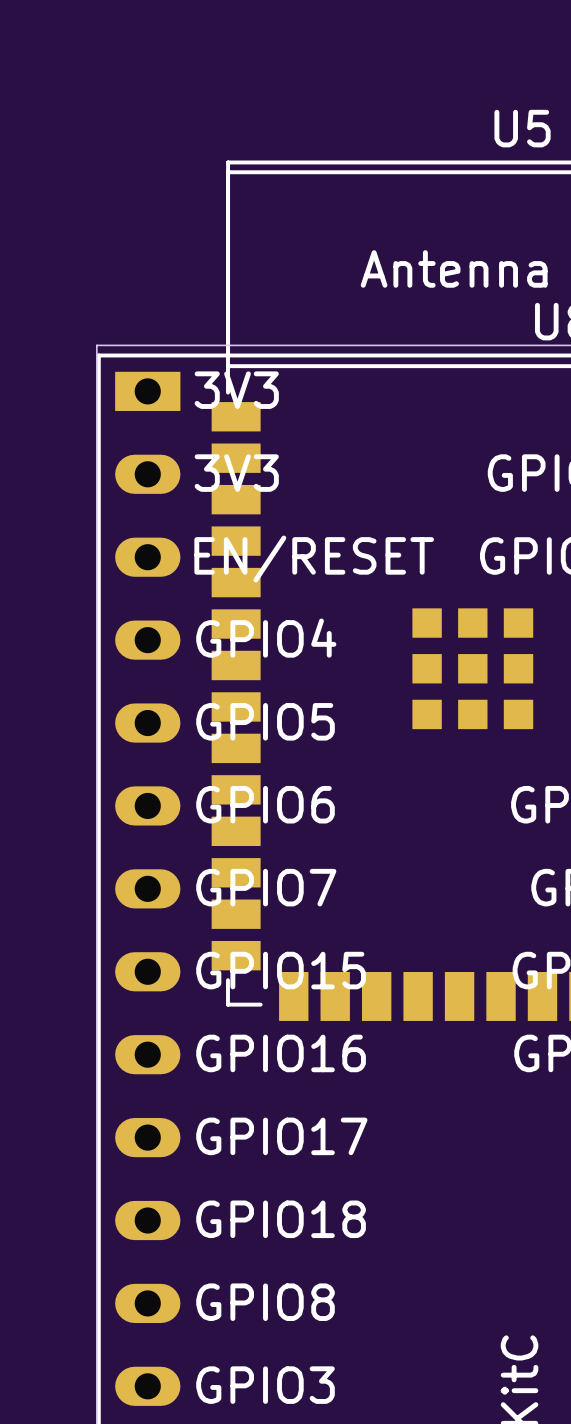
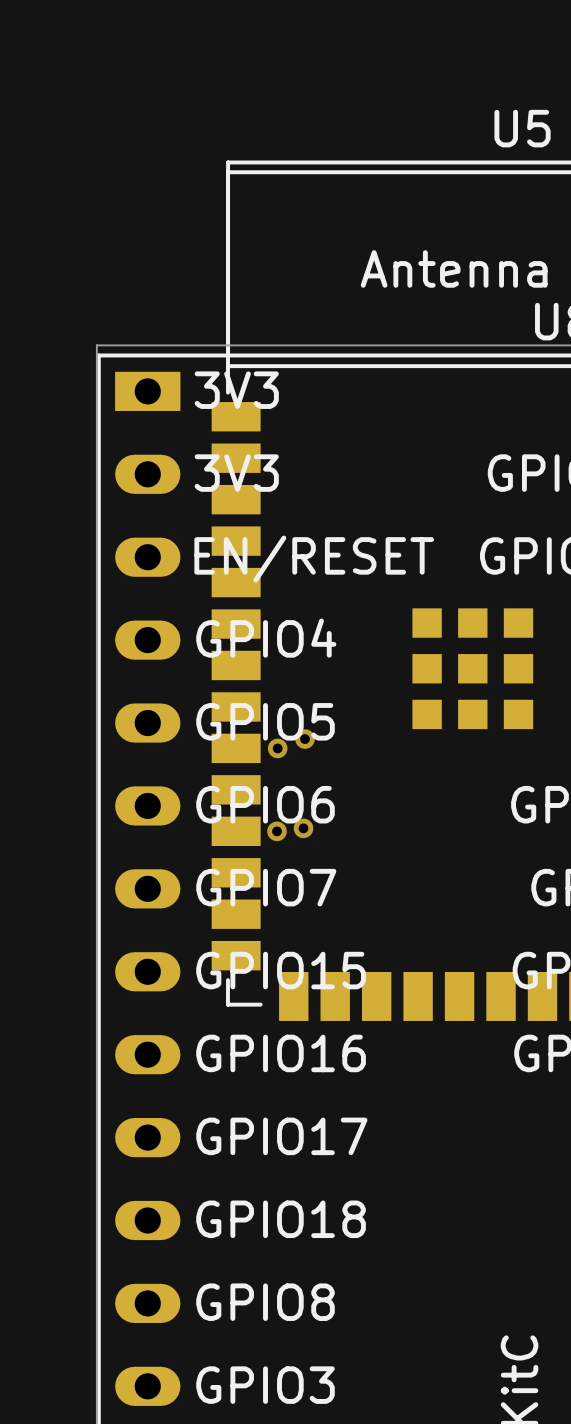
via: none -> (305, 739)
via: none -> (277, 748)
via: none -> (303, 828)
via: none -> (277, 831)

